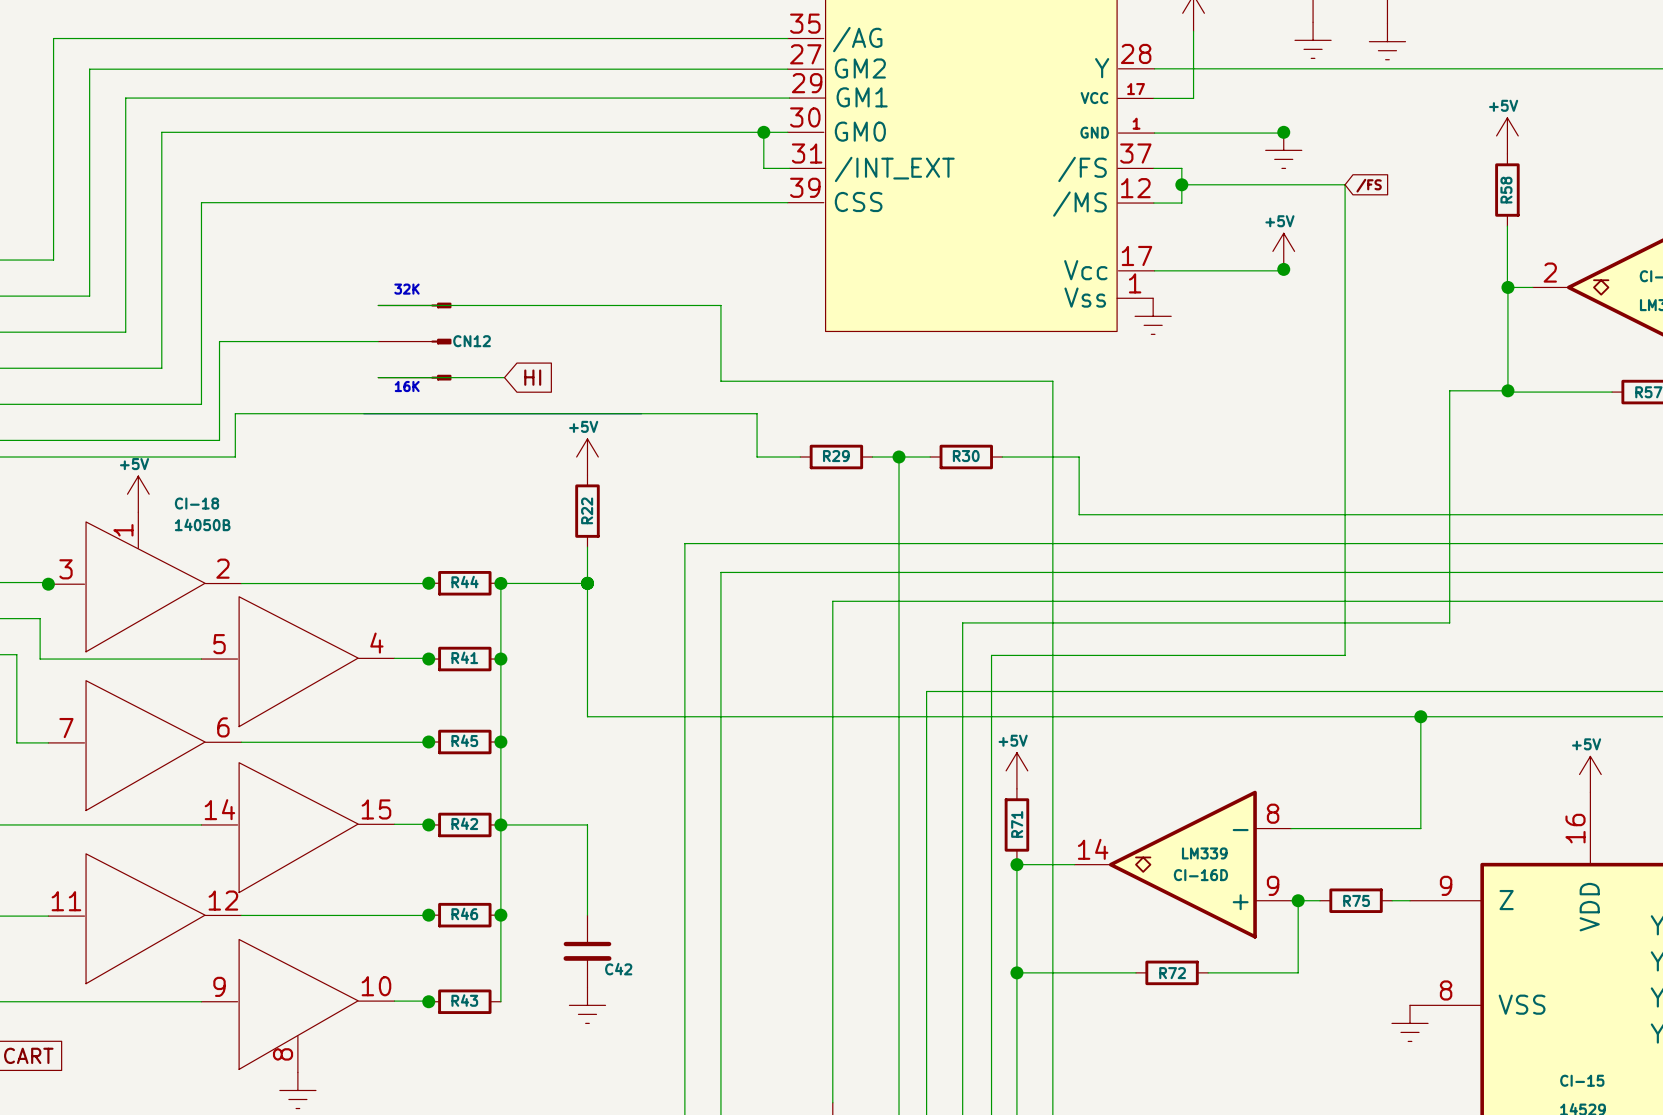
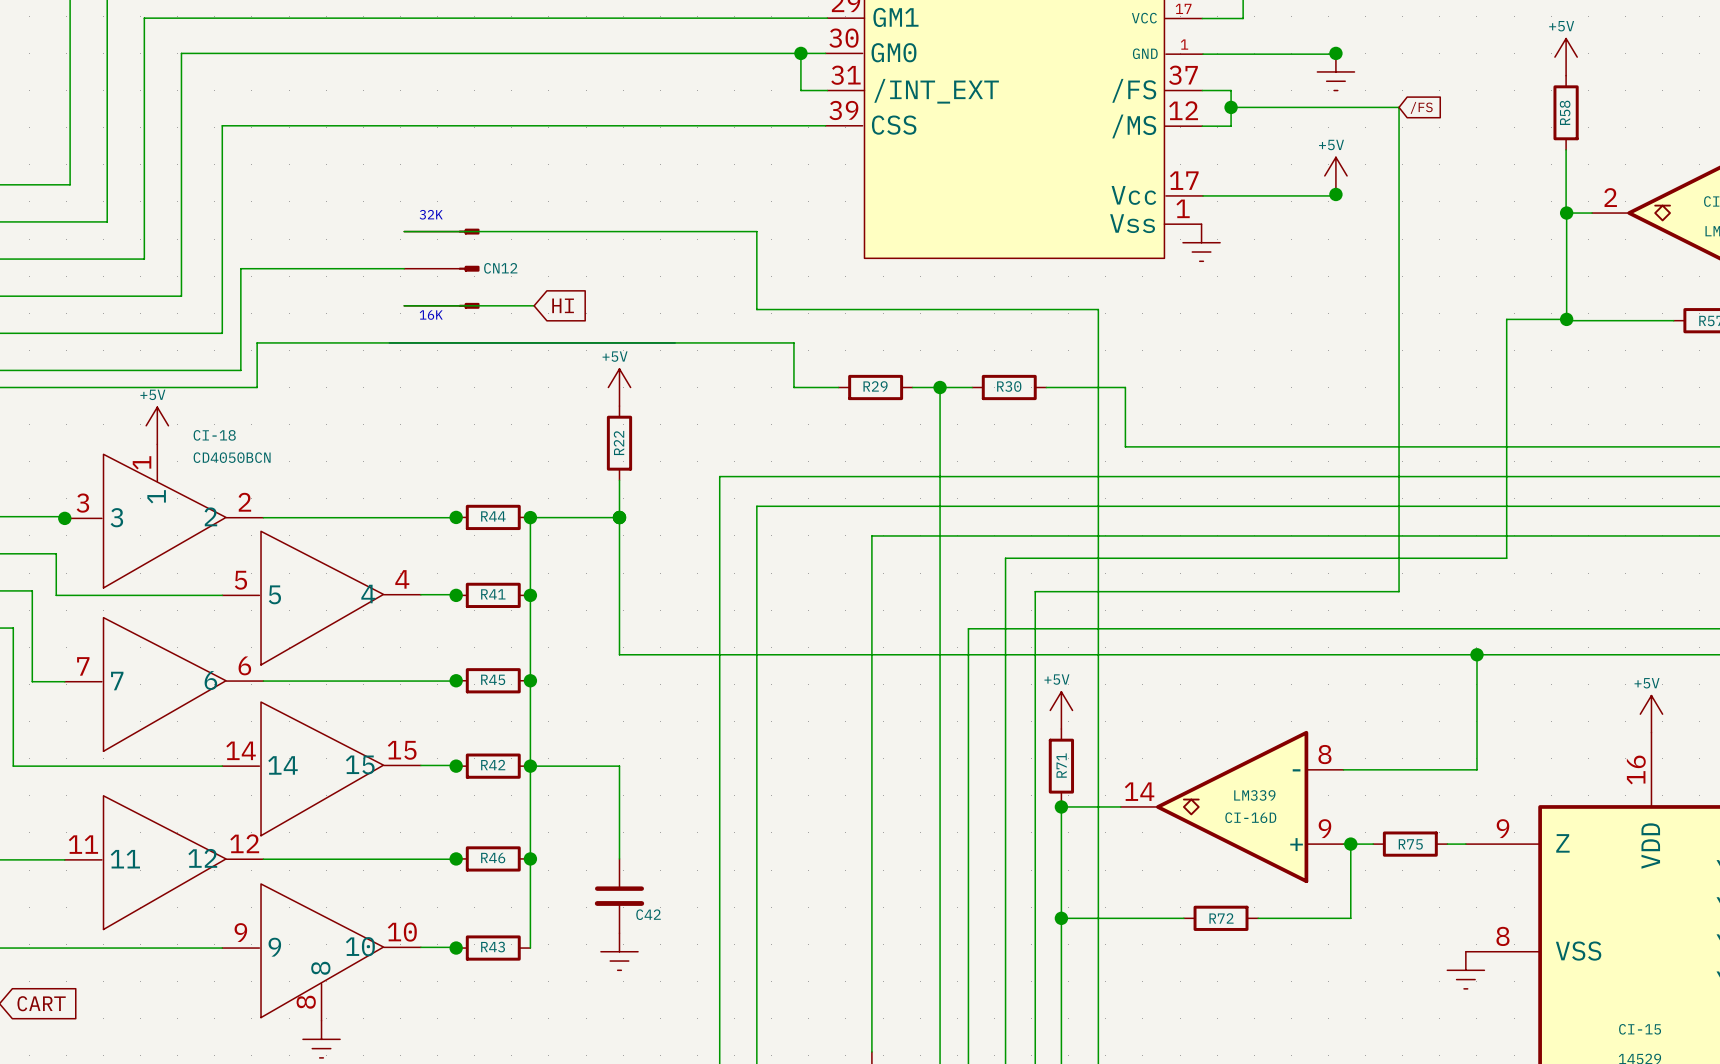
CI-18 symbol: [48, 512, 395, 1073] -> [64, 444, 421, 1021]
CI-18 value: 14050B (202, 524) -> CD4050BCN (232, 457)

